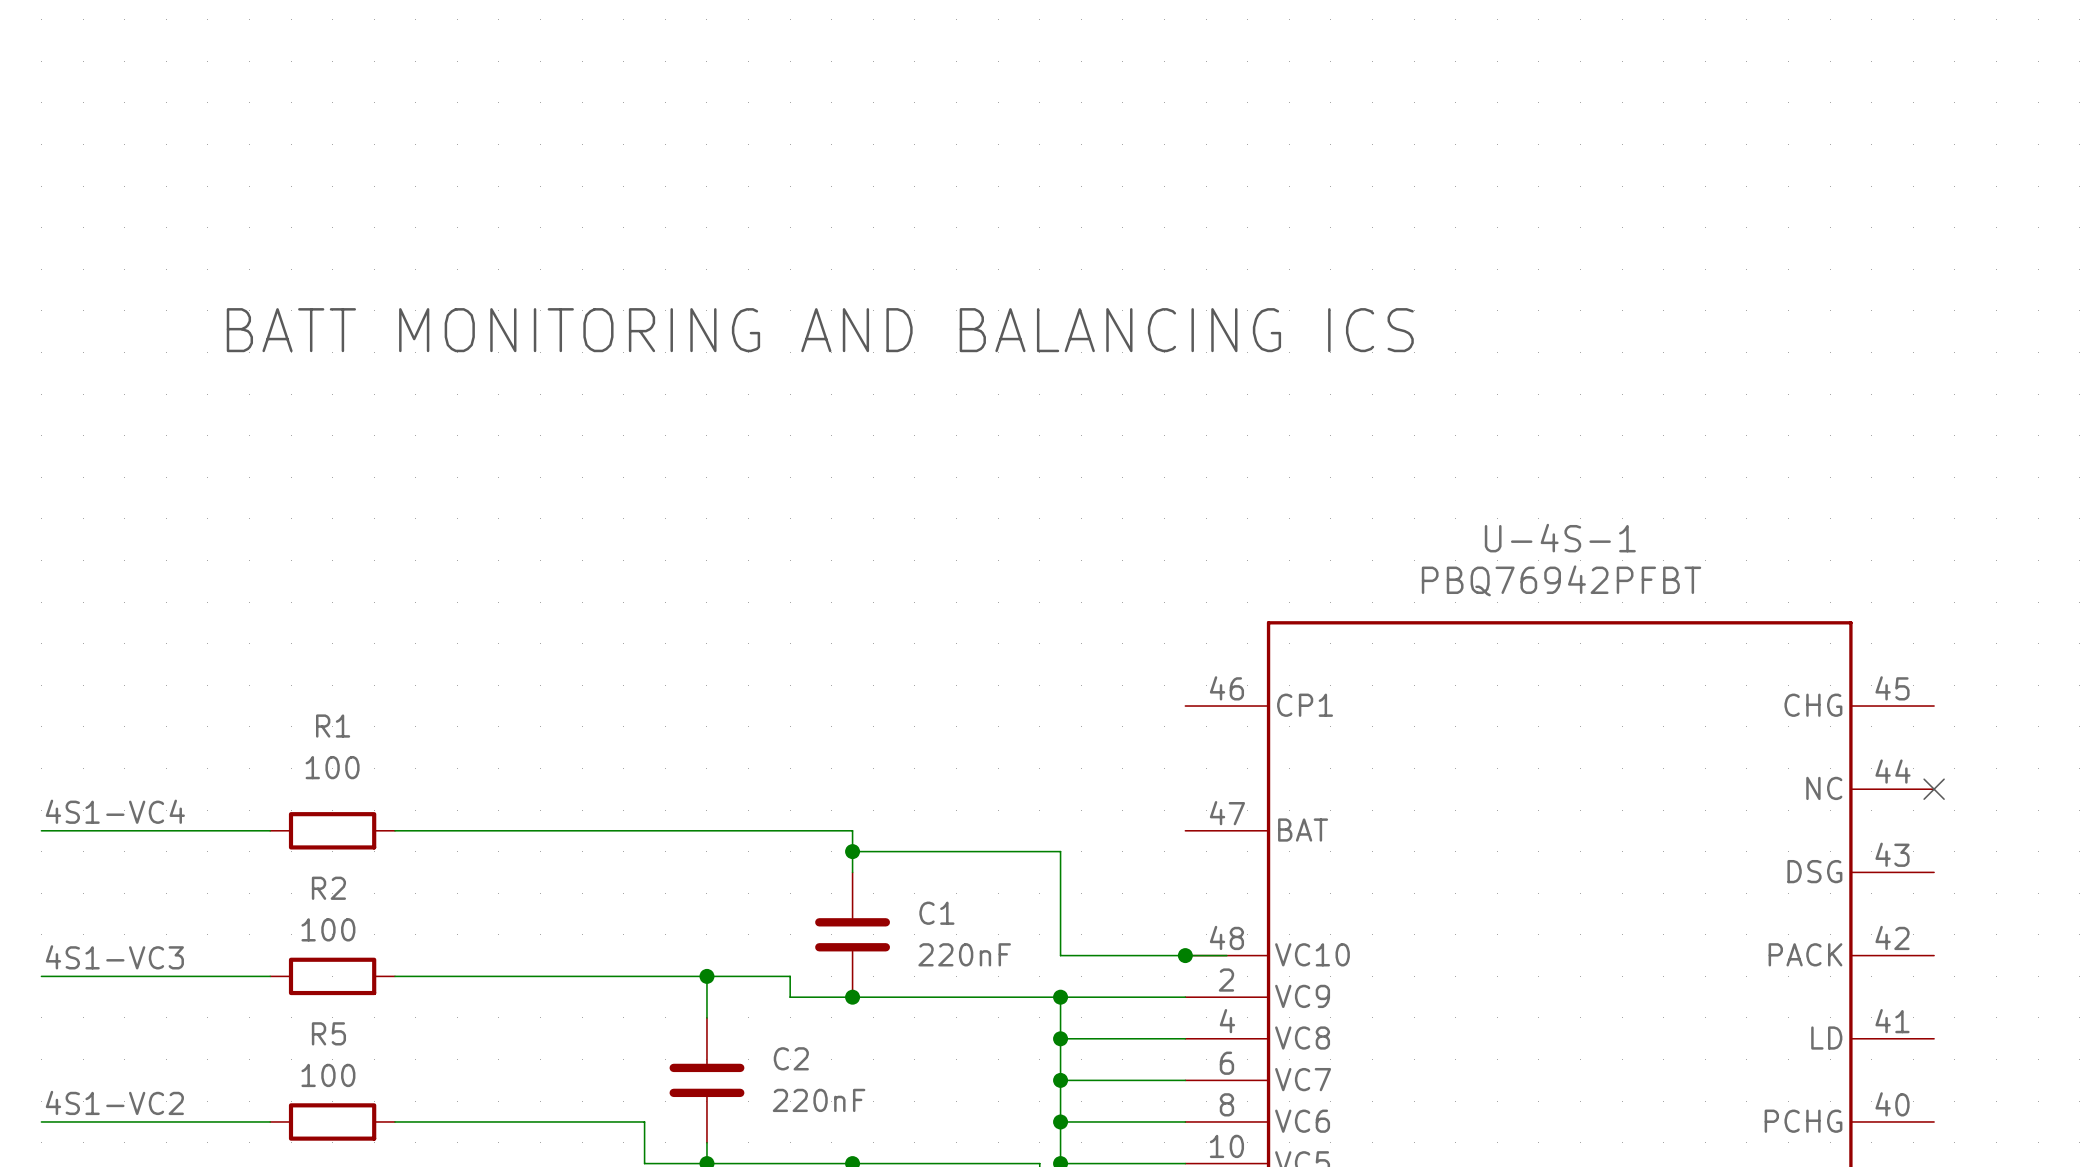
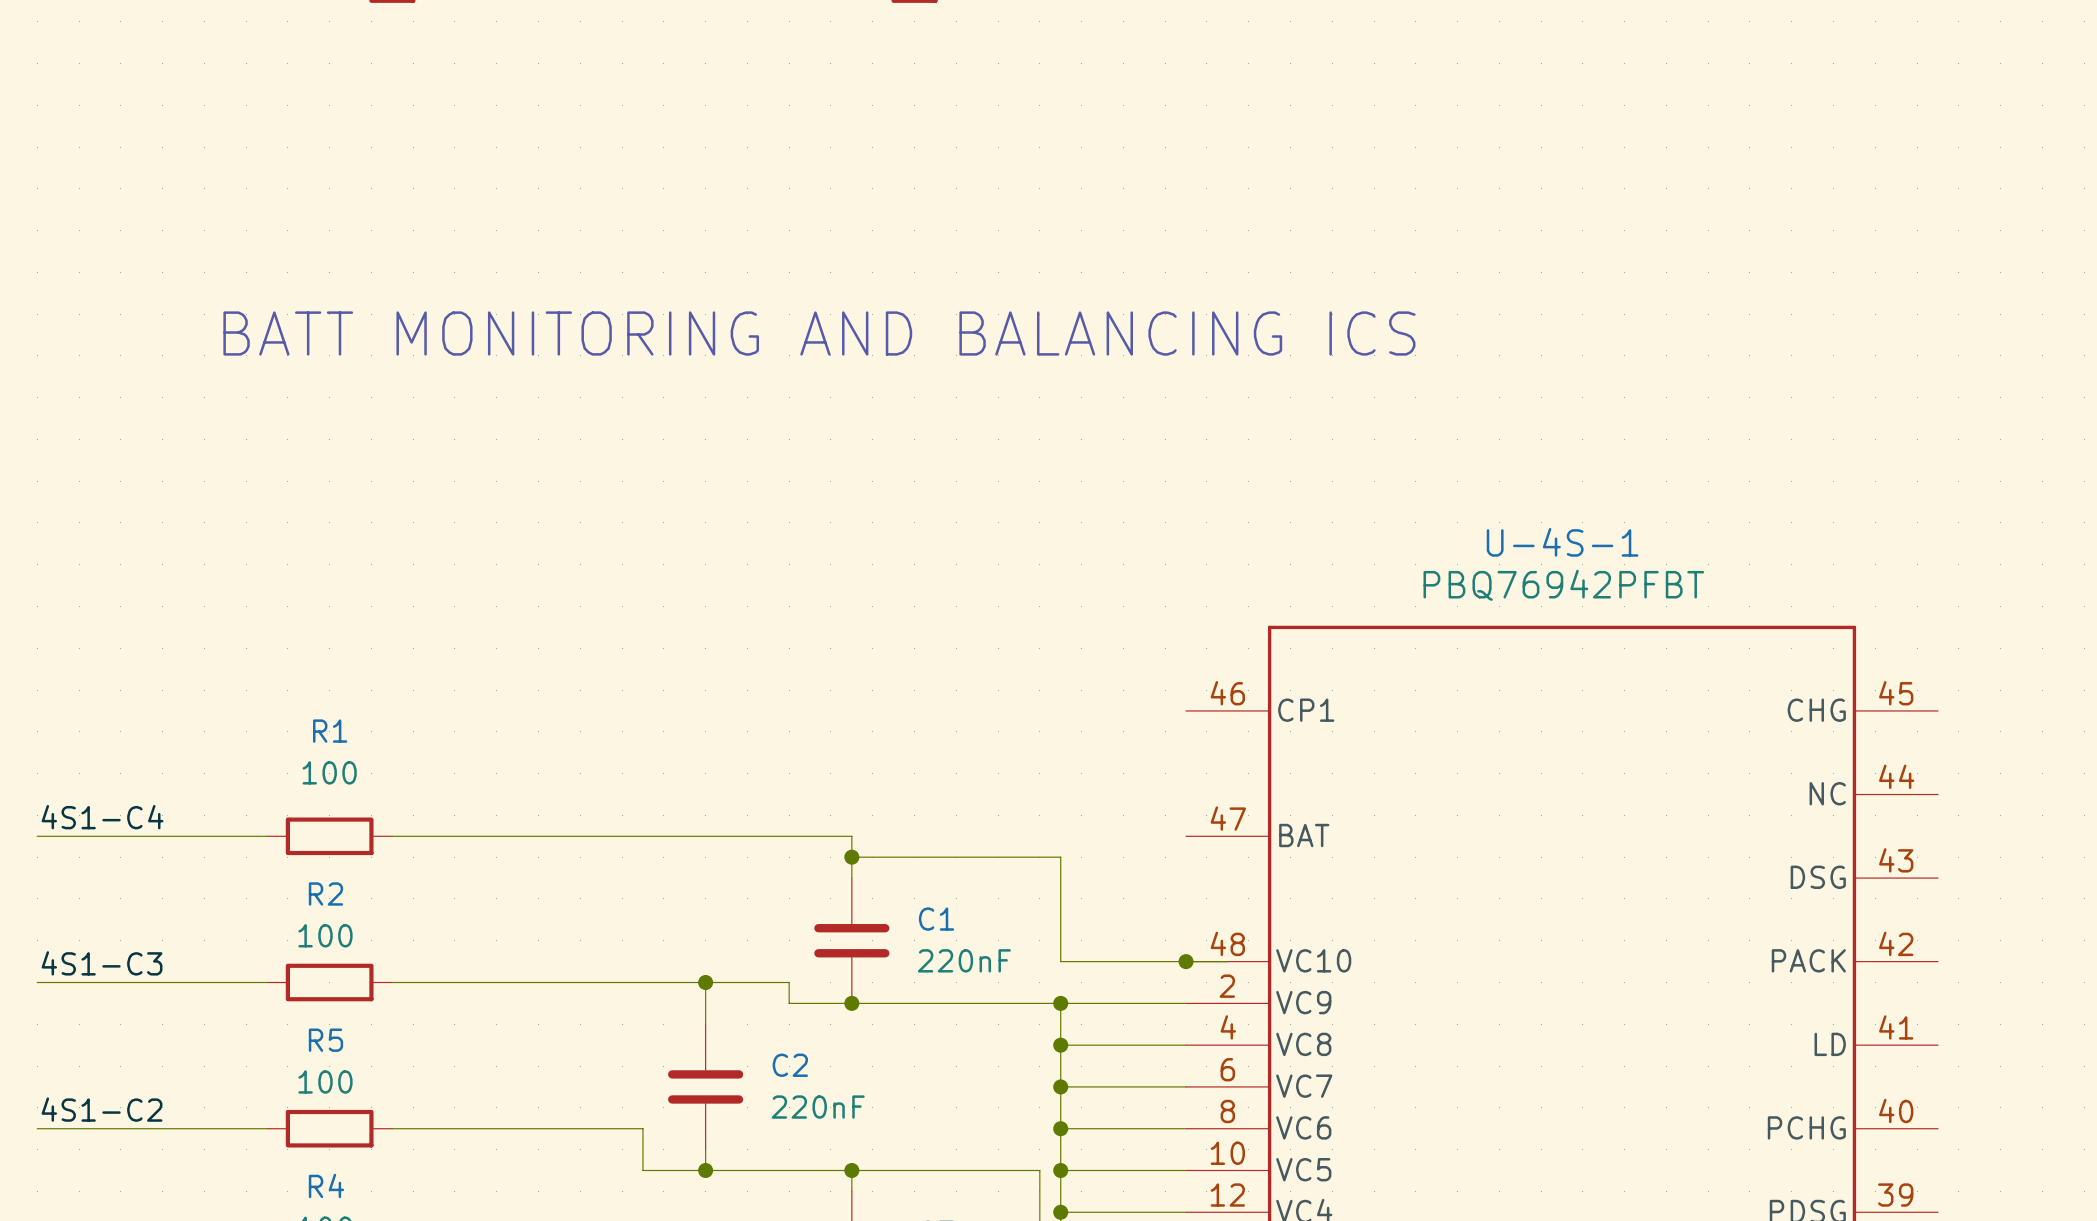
no-connect mark: (1934, 789) -> none
label: 4S1-VC4 (115, 811) -> 4S1-C4 (102, 817)
label: 4S1-VC3 (114, 957) -> 4S1-C3 (102, 963)
label: 4S1-VC2 (114, 1102) -> 4S1-C2 (102, 1109)

